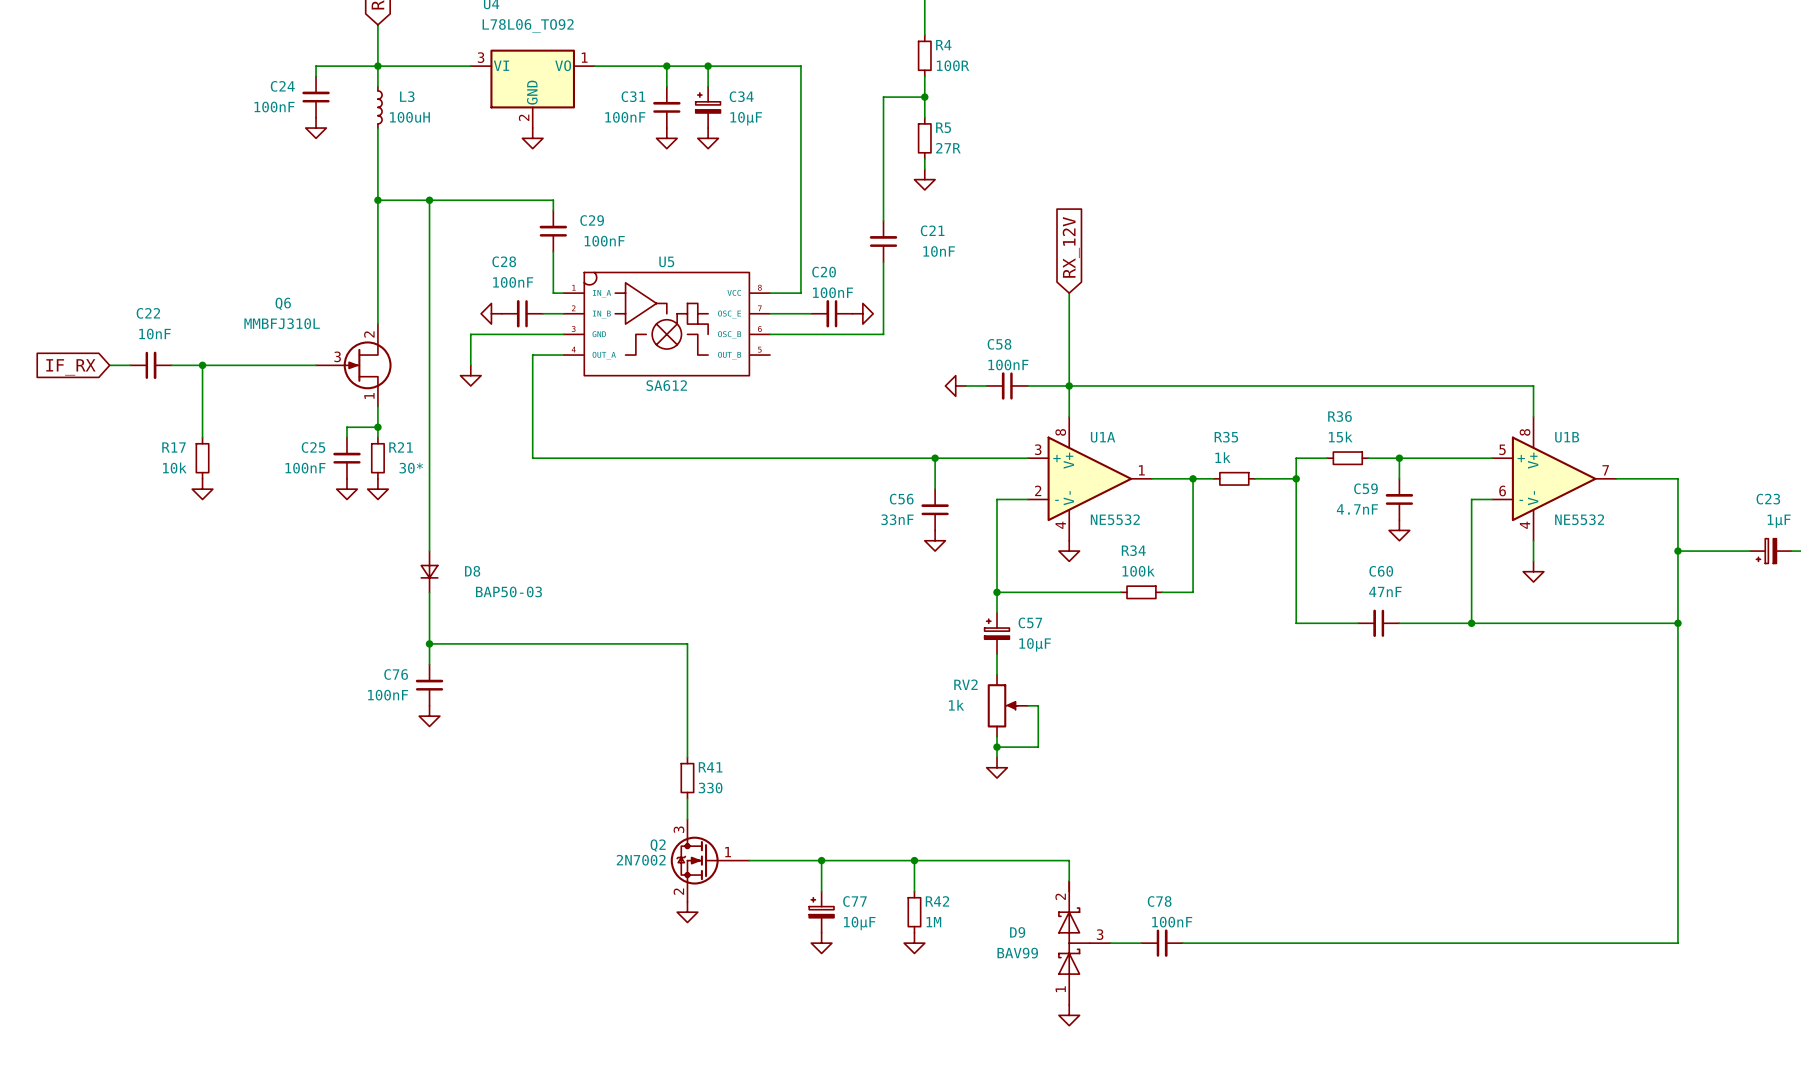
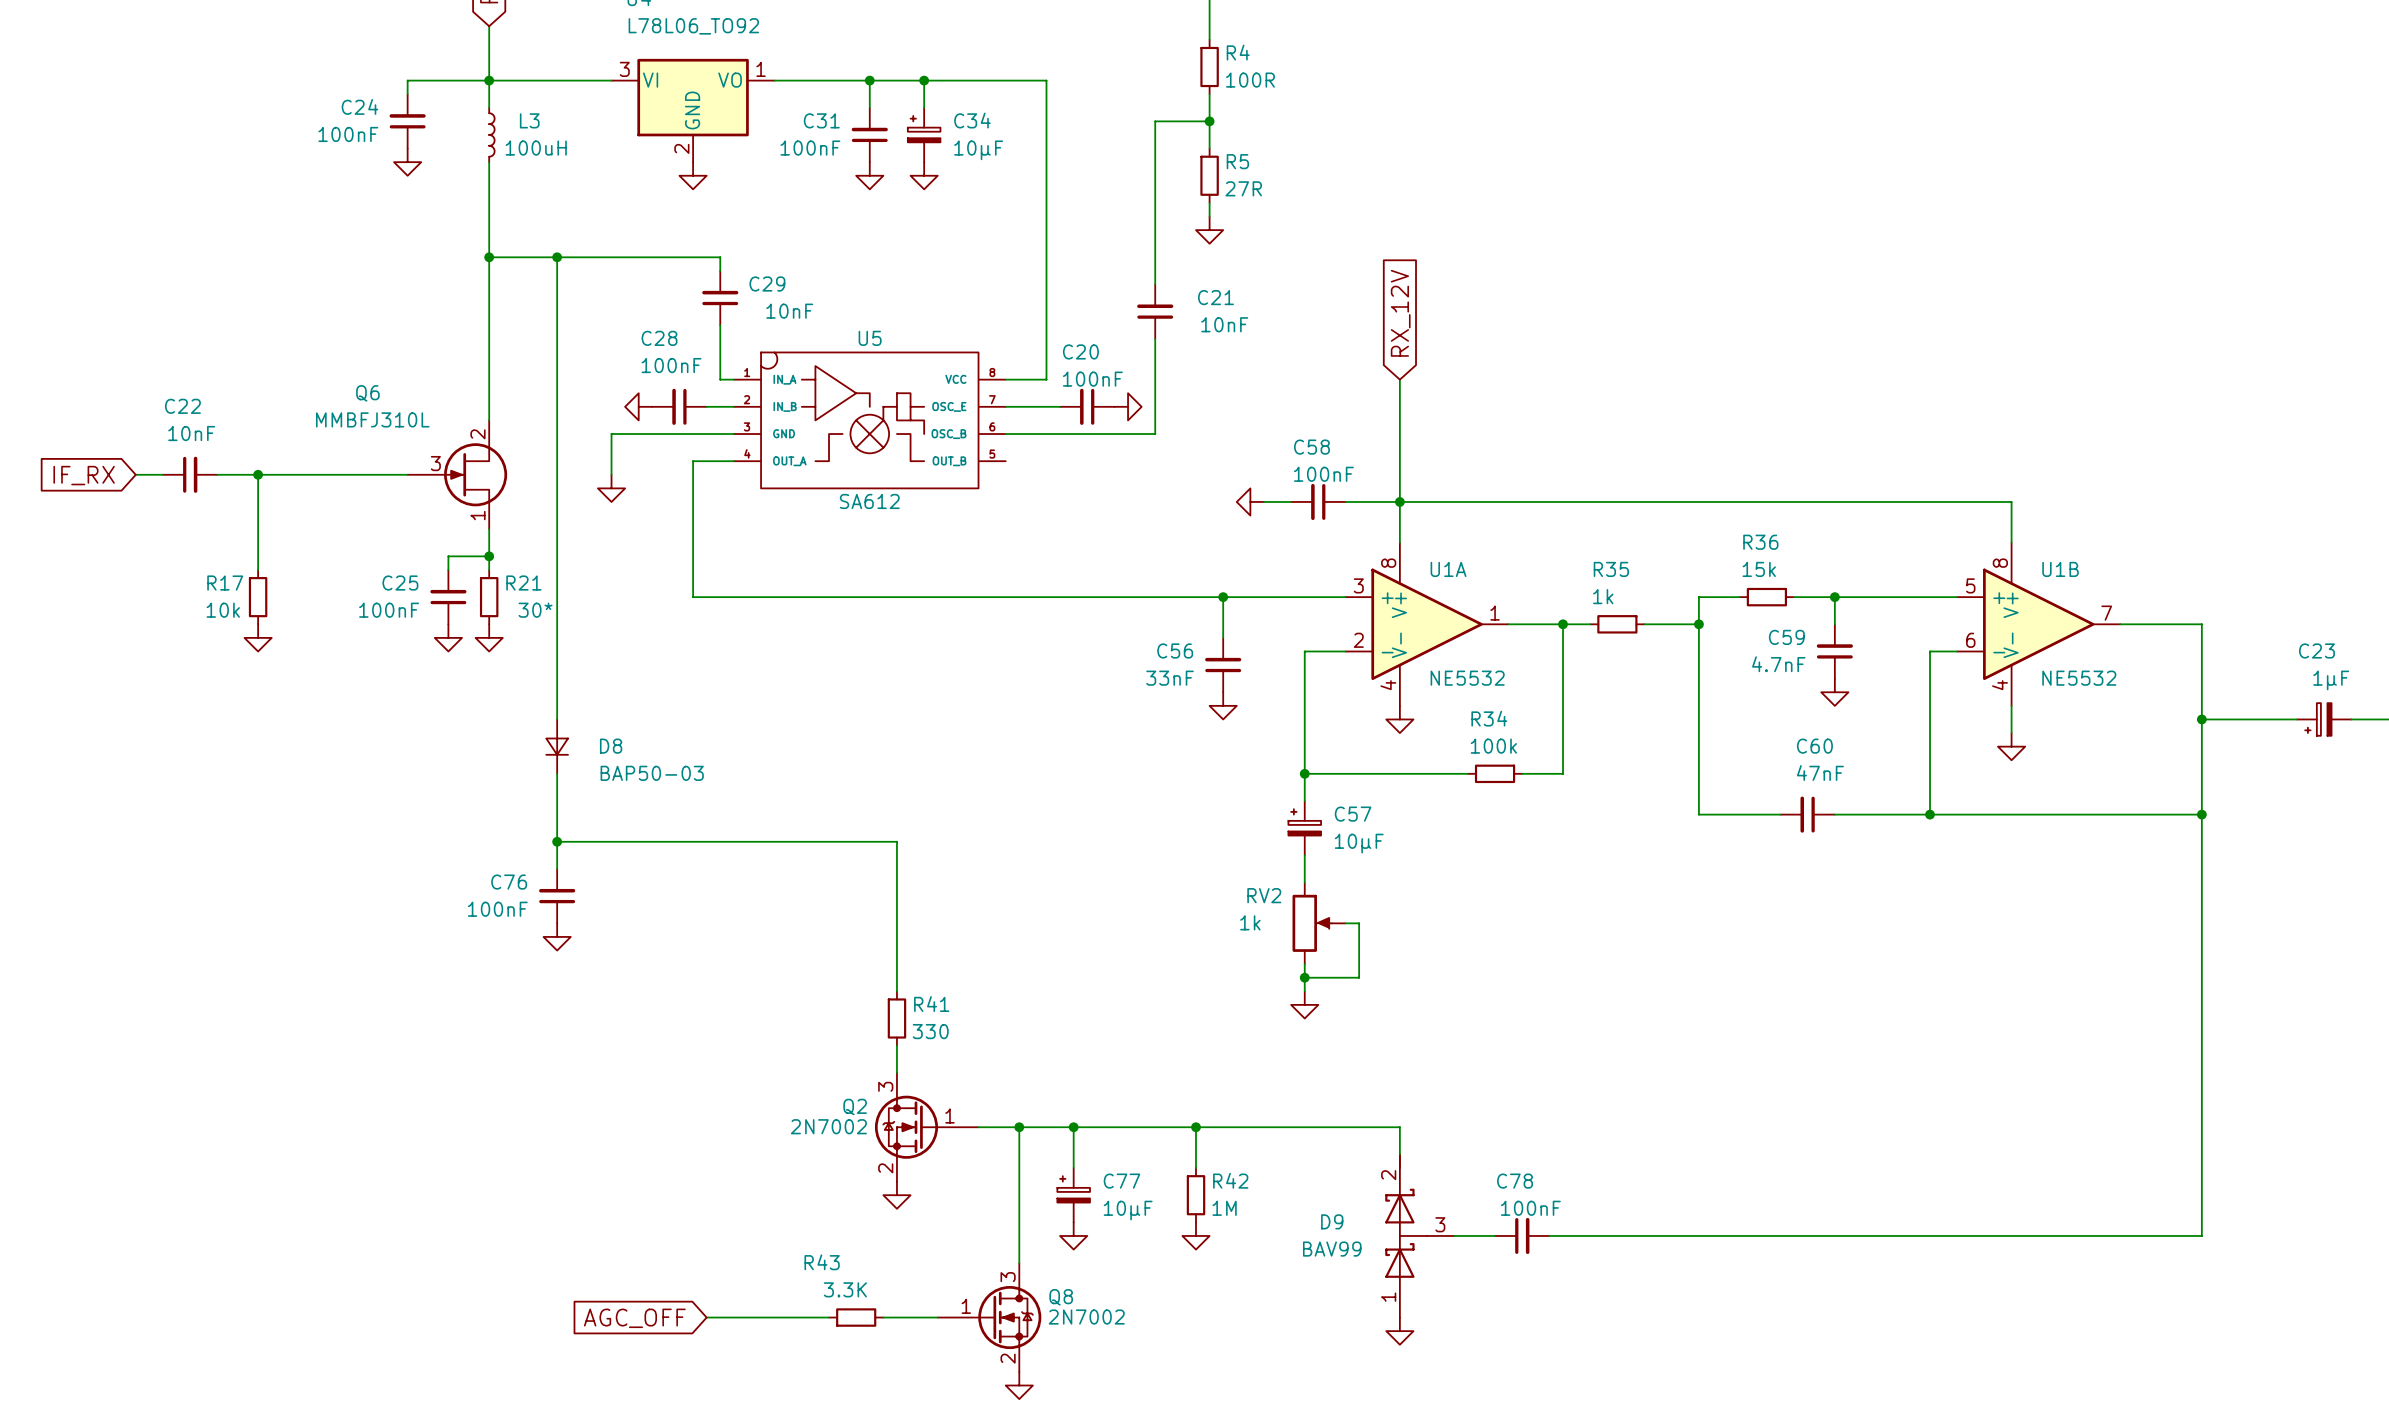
C29 value: 100nF (604, 241) -> 10nF (789, 311)
wire: none -> (1019, 1127) (1019, 1263)
junction: none -> (1019, 1127)
wire: none -> (706, 1317) (829, 1317)
R43: none -> 3.3K (856, 1317)
wire: none -> (883, 1317) (937, 1317)
Q8: none -> 2N7002 (989, 1317)
global label: none -> AGC_OFF (634, 1318)
power symbol: none -> (1019, 1385)

